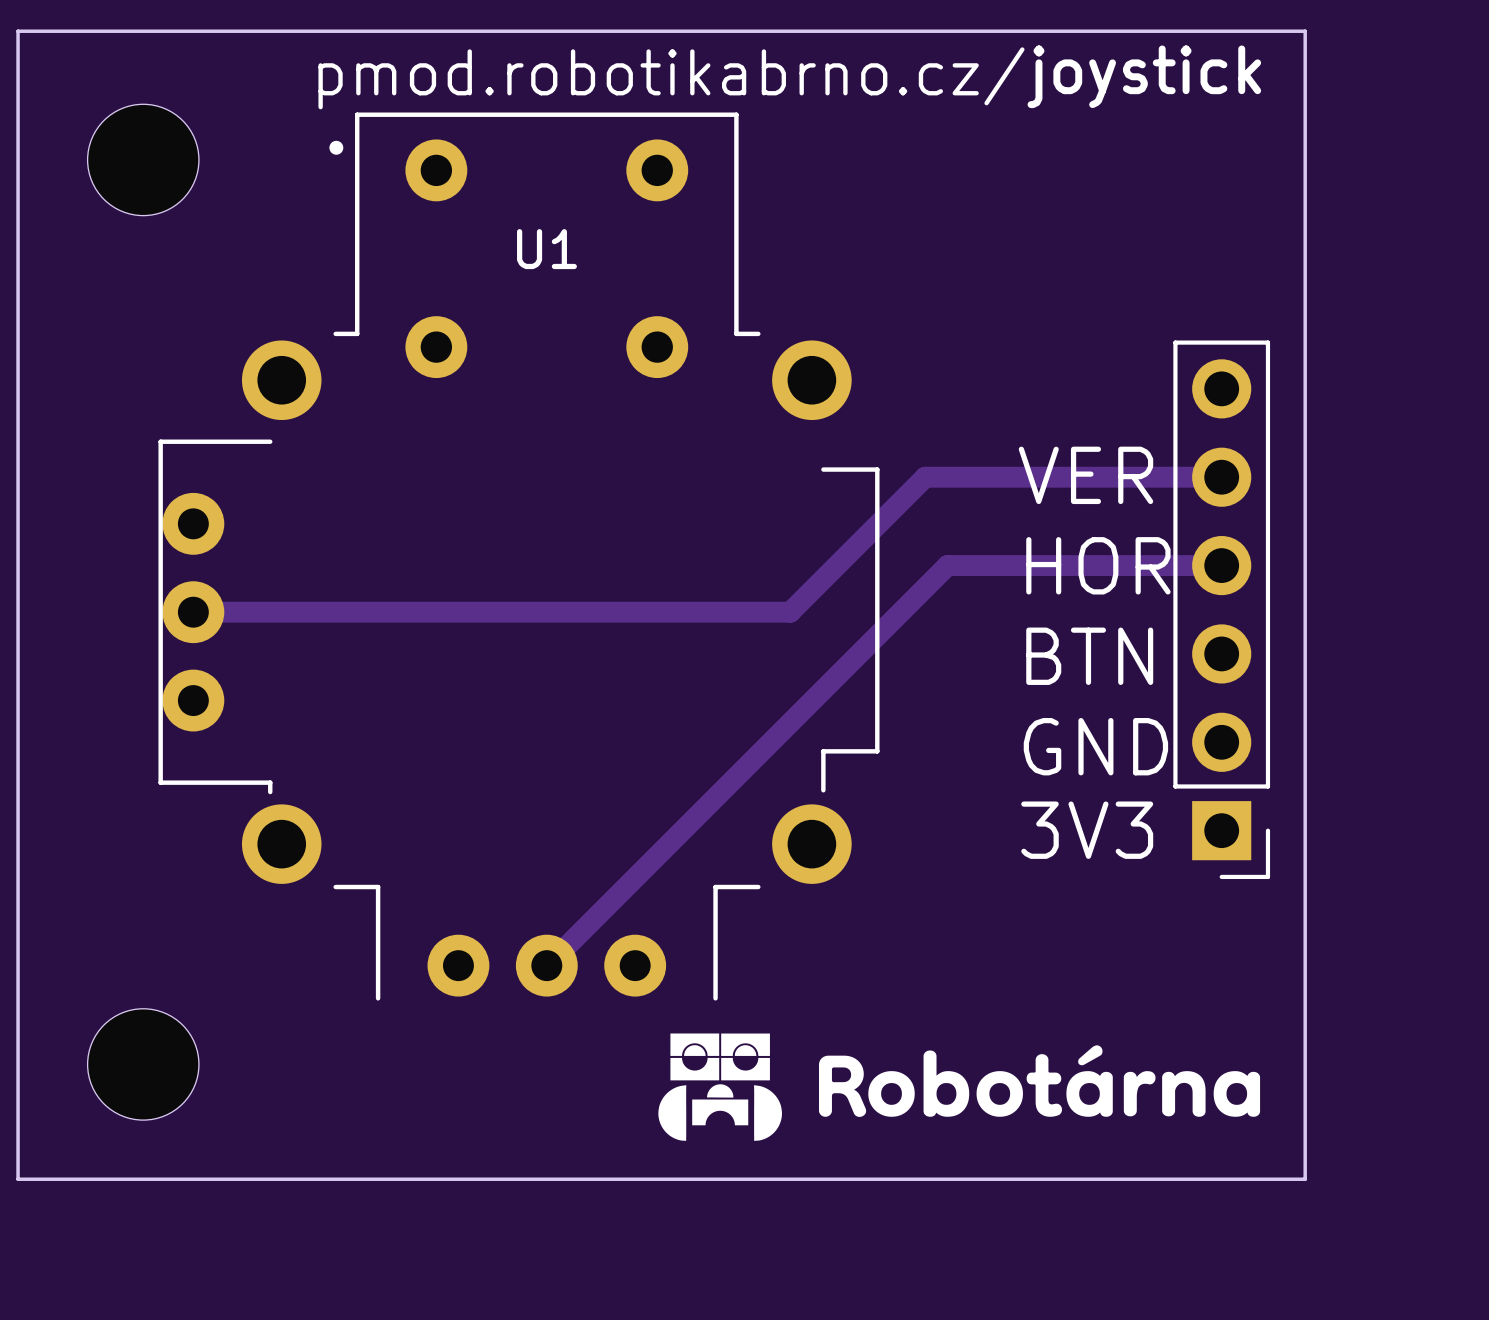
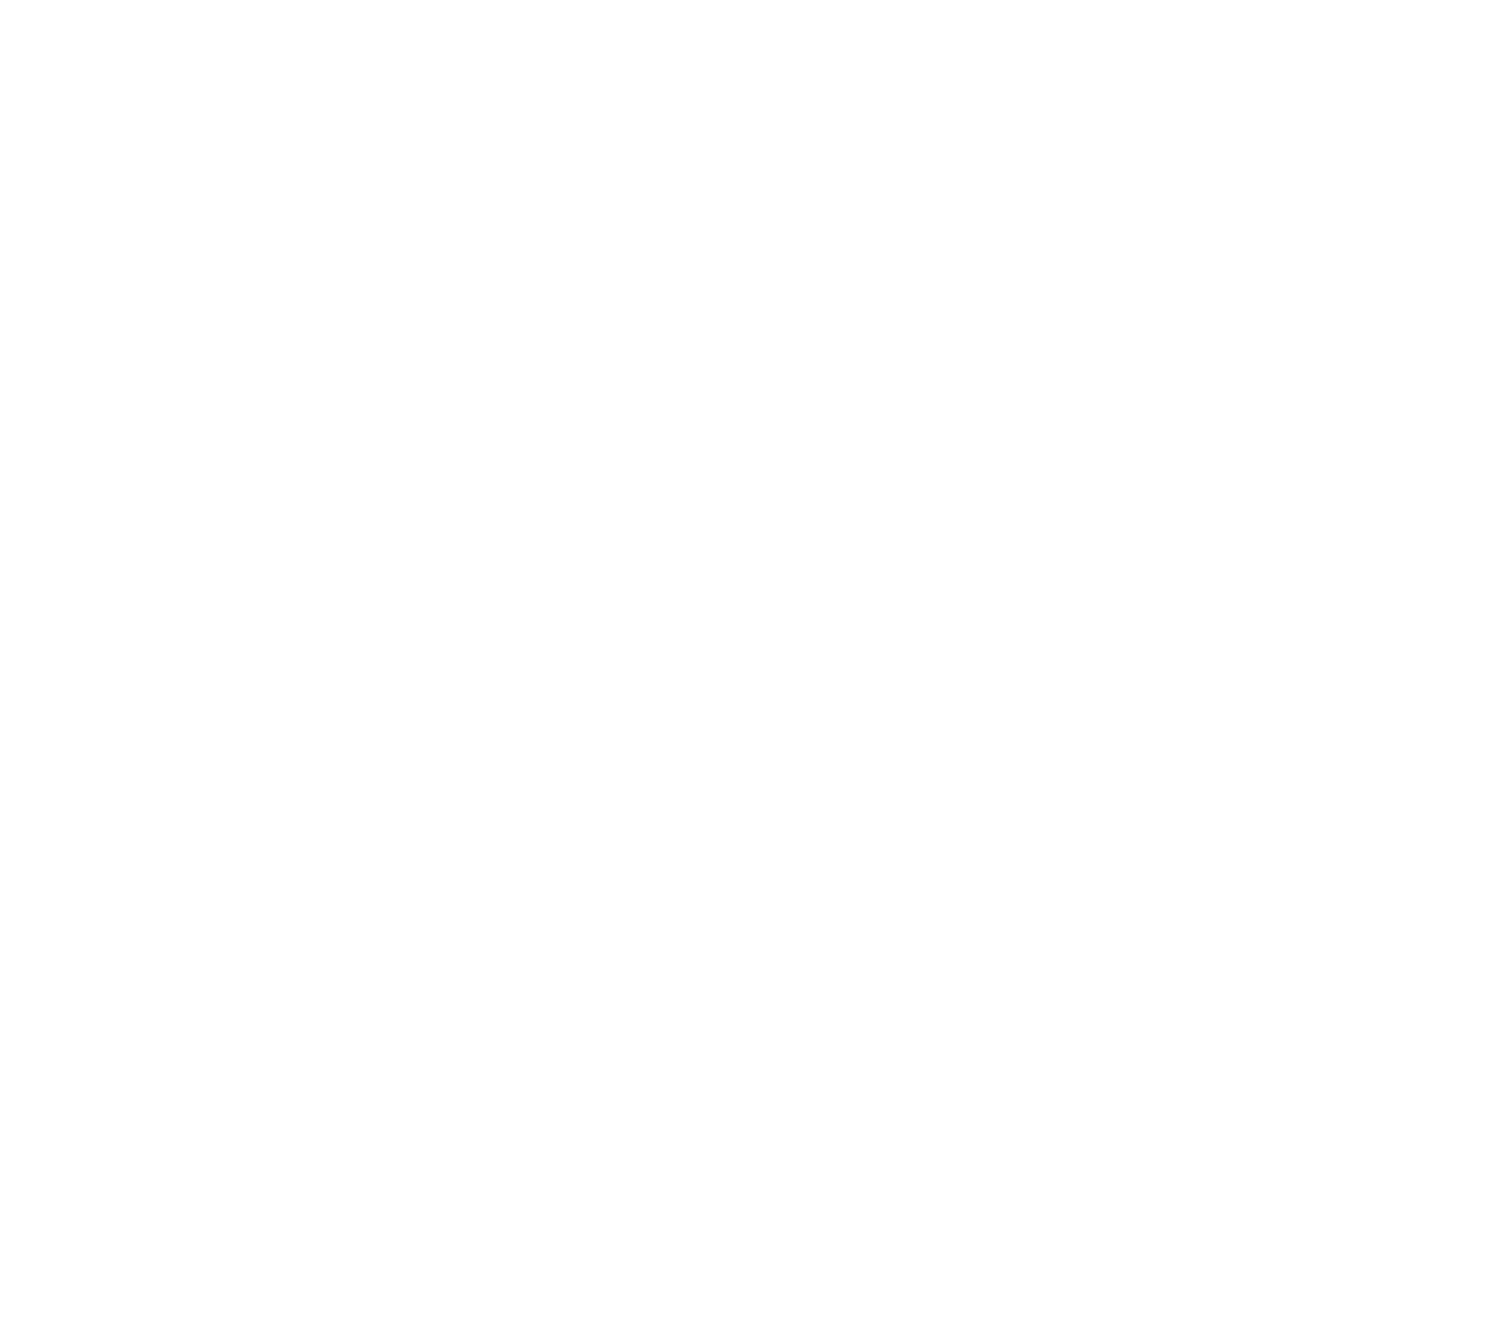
board edge: (18, 31) (1305, 31) (1305, 1179) (18, 1179) (18, 31) -> none
text: joystick (1144, 76) -> none
text: pmod.robotikabrno.cz/ (671, 78) -> none
part: (143, 159) -> none
text: VER (1085, 475) -> none
track: (1221, 477) (925, 477) (790, 612) (194, 612) -> none
U1: (518, 556) -> none
text: HOR (1098, 565) -> none
track: (1221, 565) (947, 565) (547, 965) -> none
part: (1221, 609) -> none
text: BTN (1089, 656) -> none
text: GND (1095, 746) -> none
text: 3V3 (1087, 830) -> none
drawing: [658, 1033, 1261, 1141] -> none
part: (143, 1064) -> none

